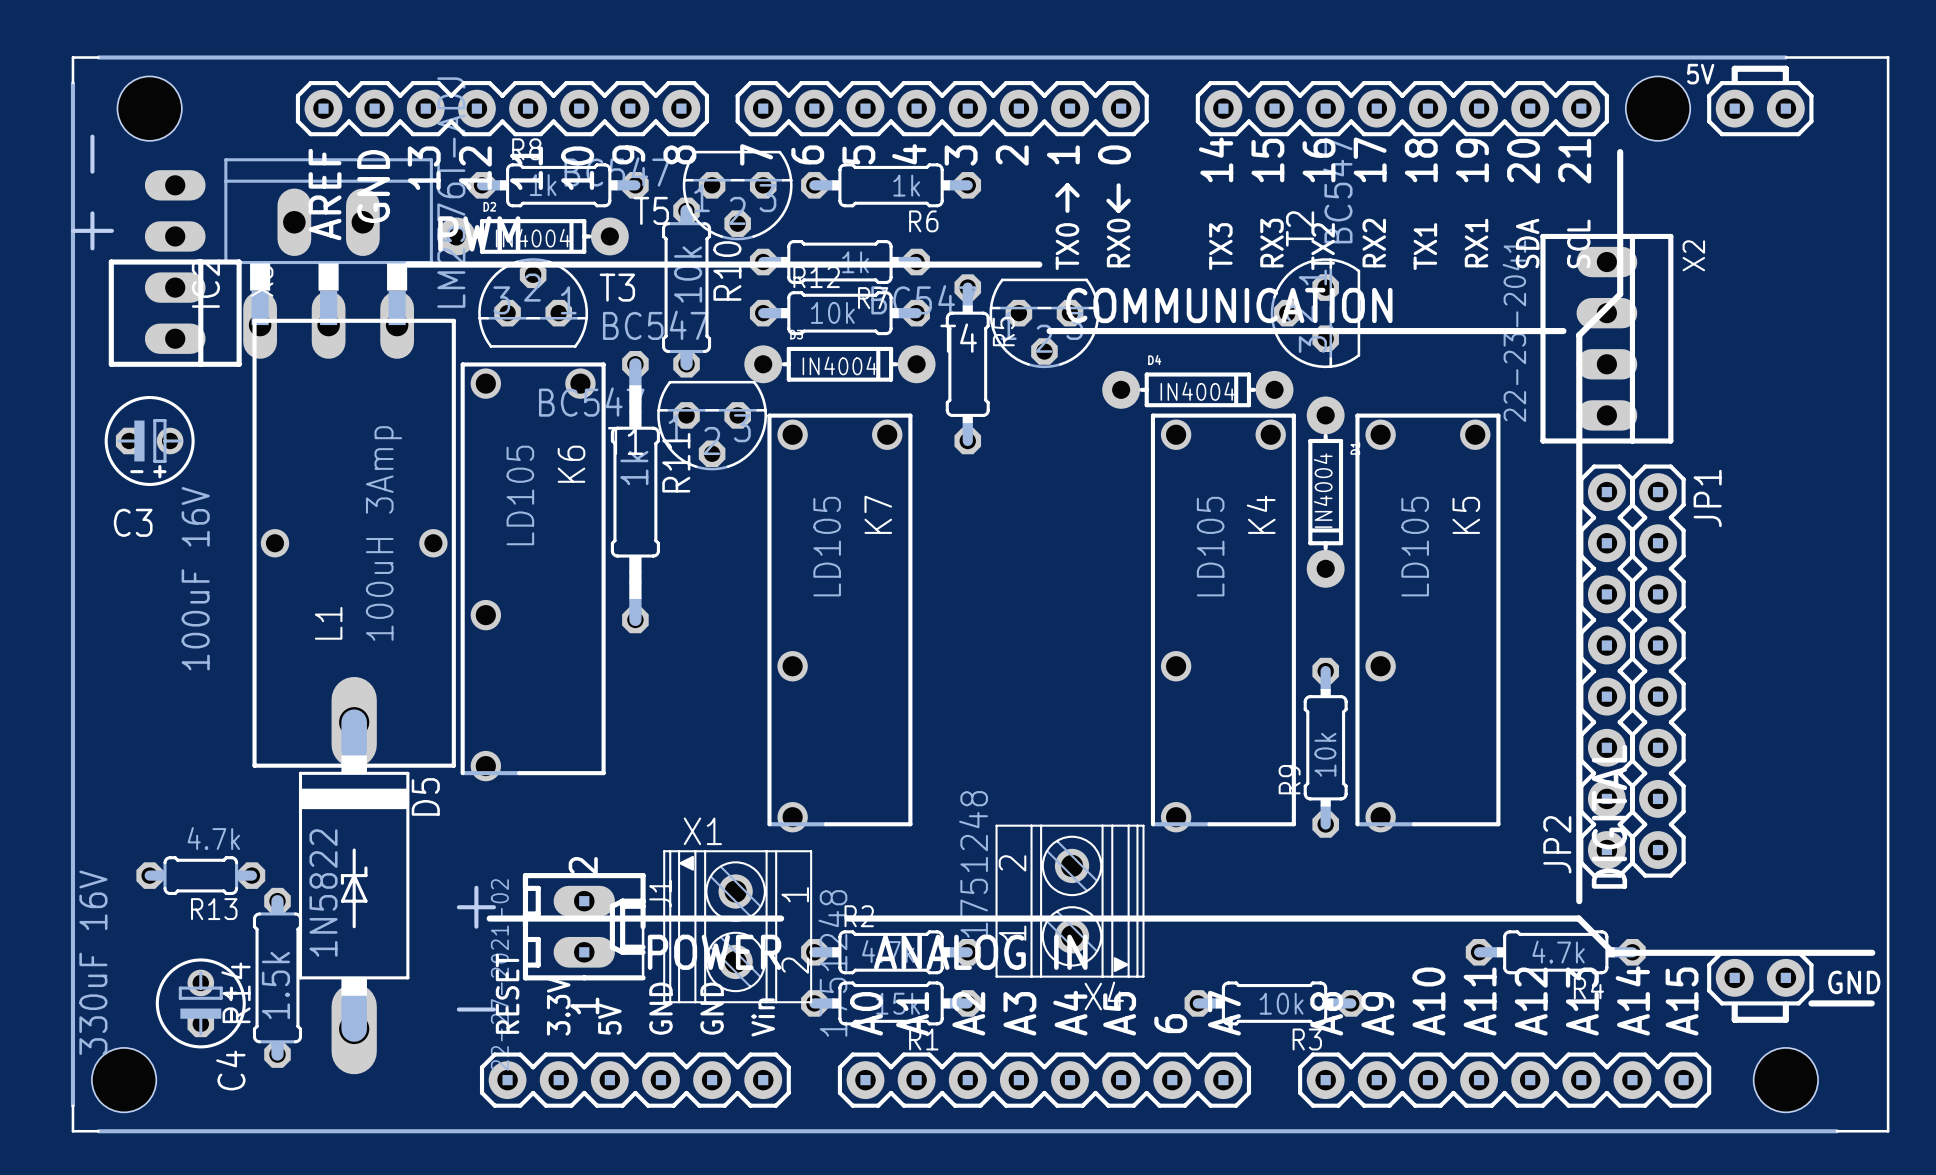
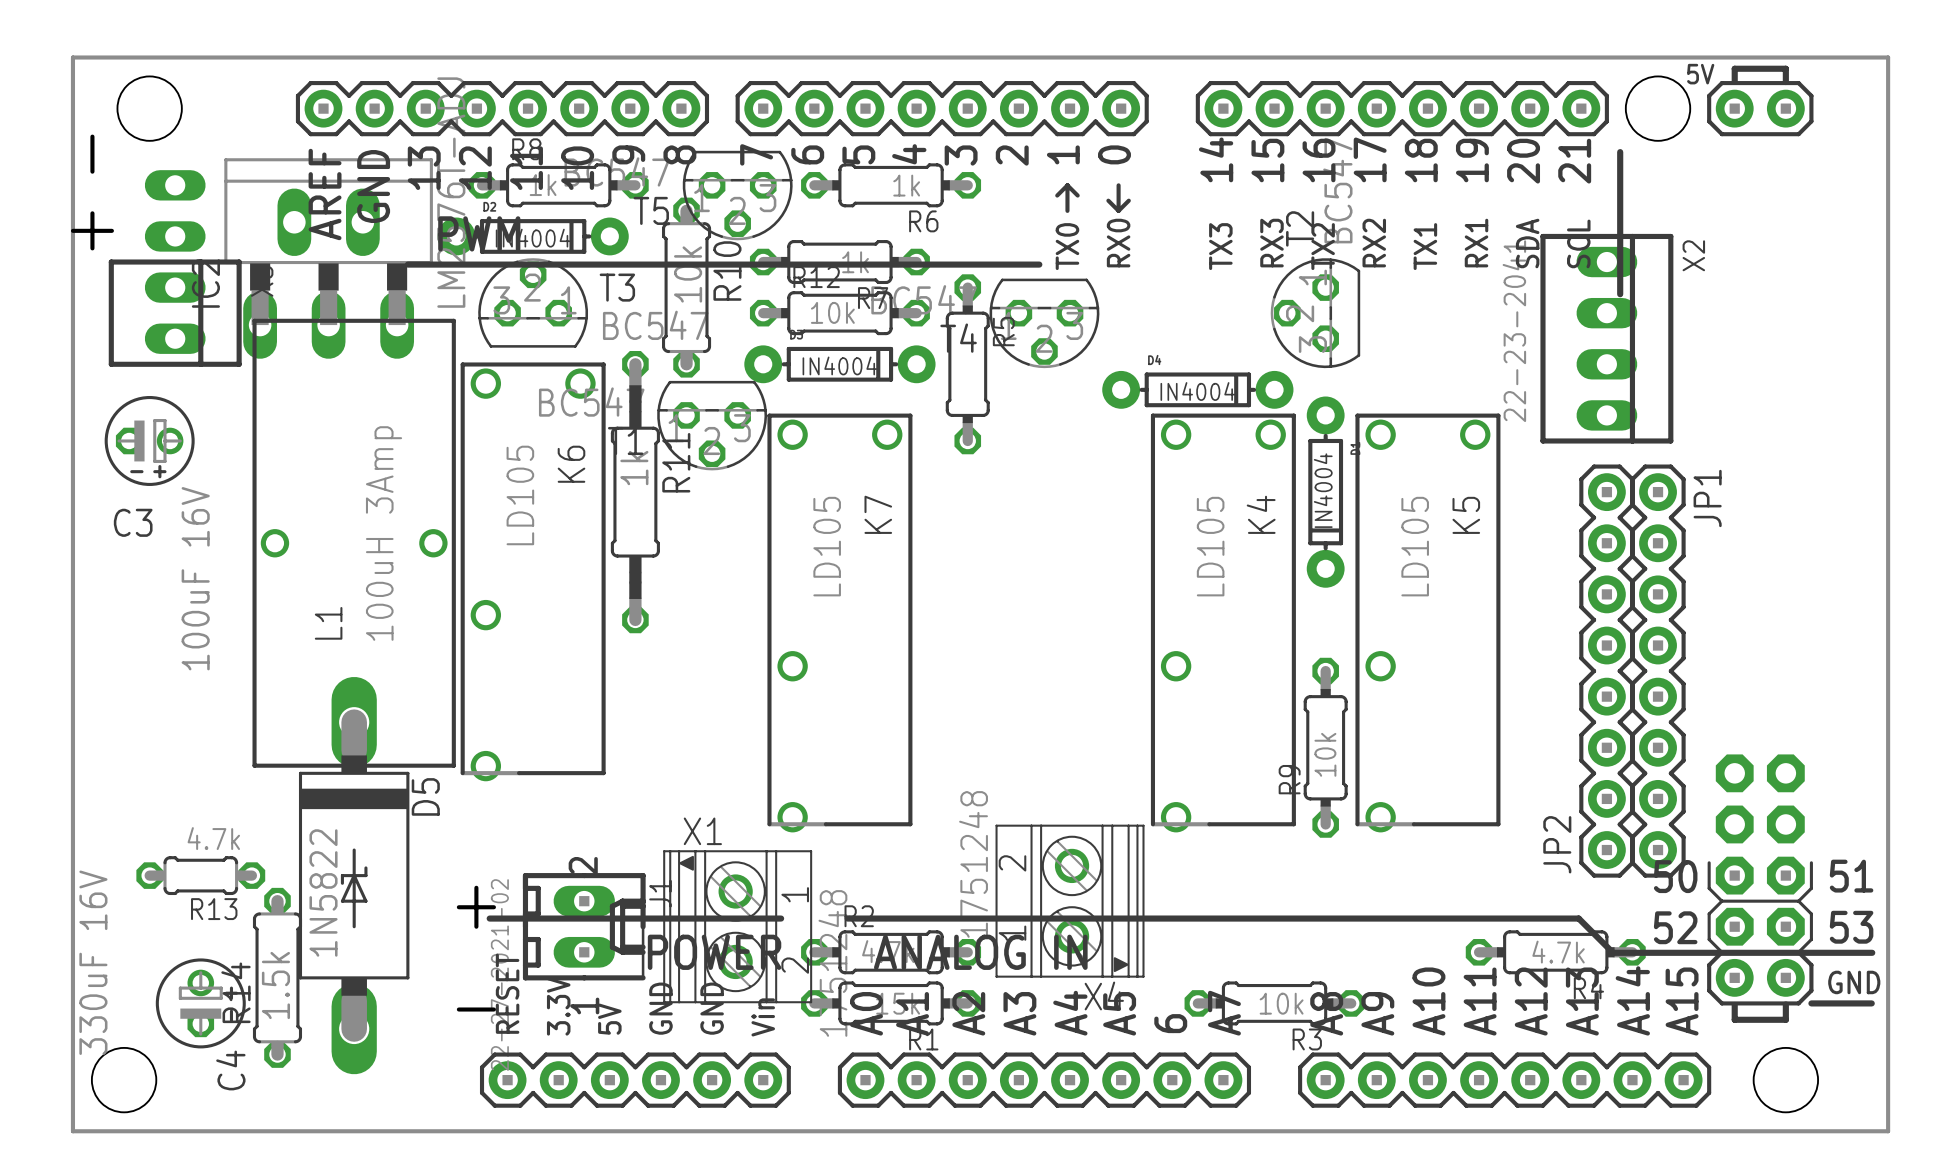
part footprint: [70, 55, 1890, 1134] -> [70, 55, 1891, 1134]

